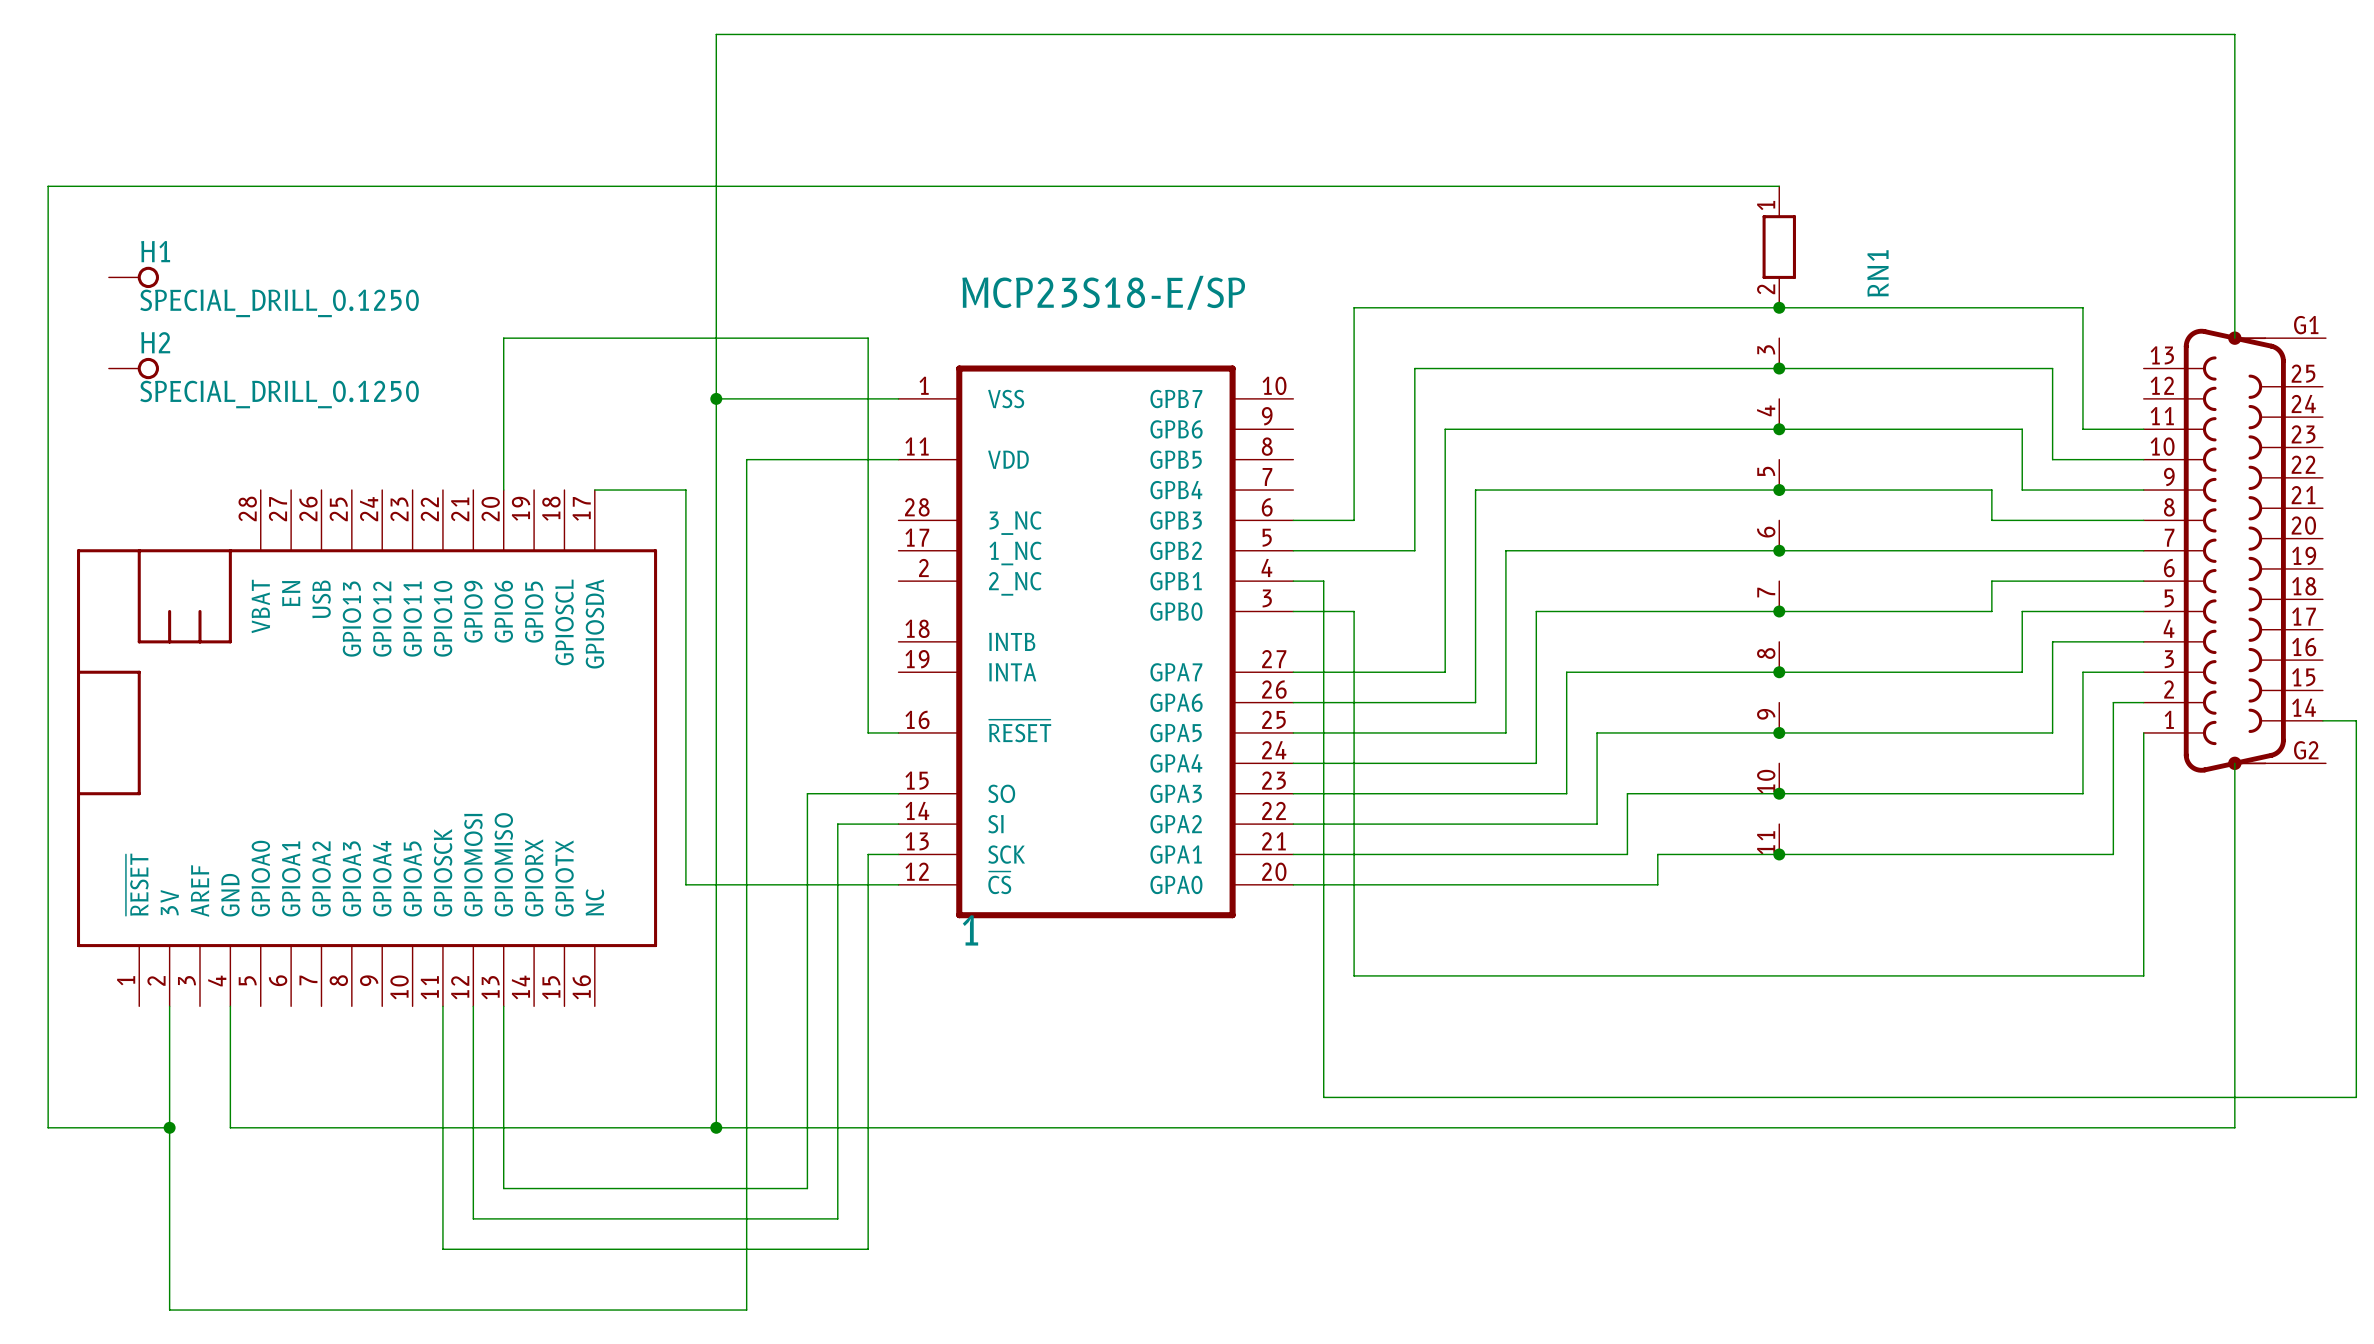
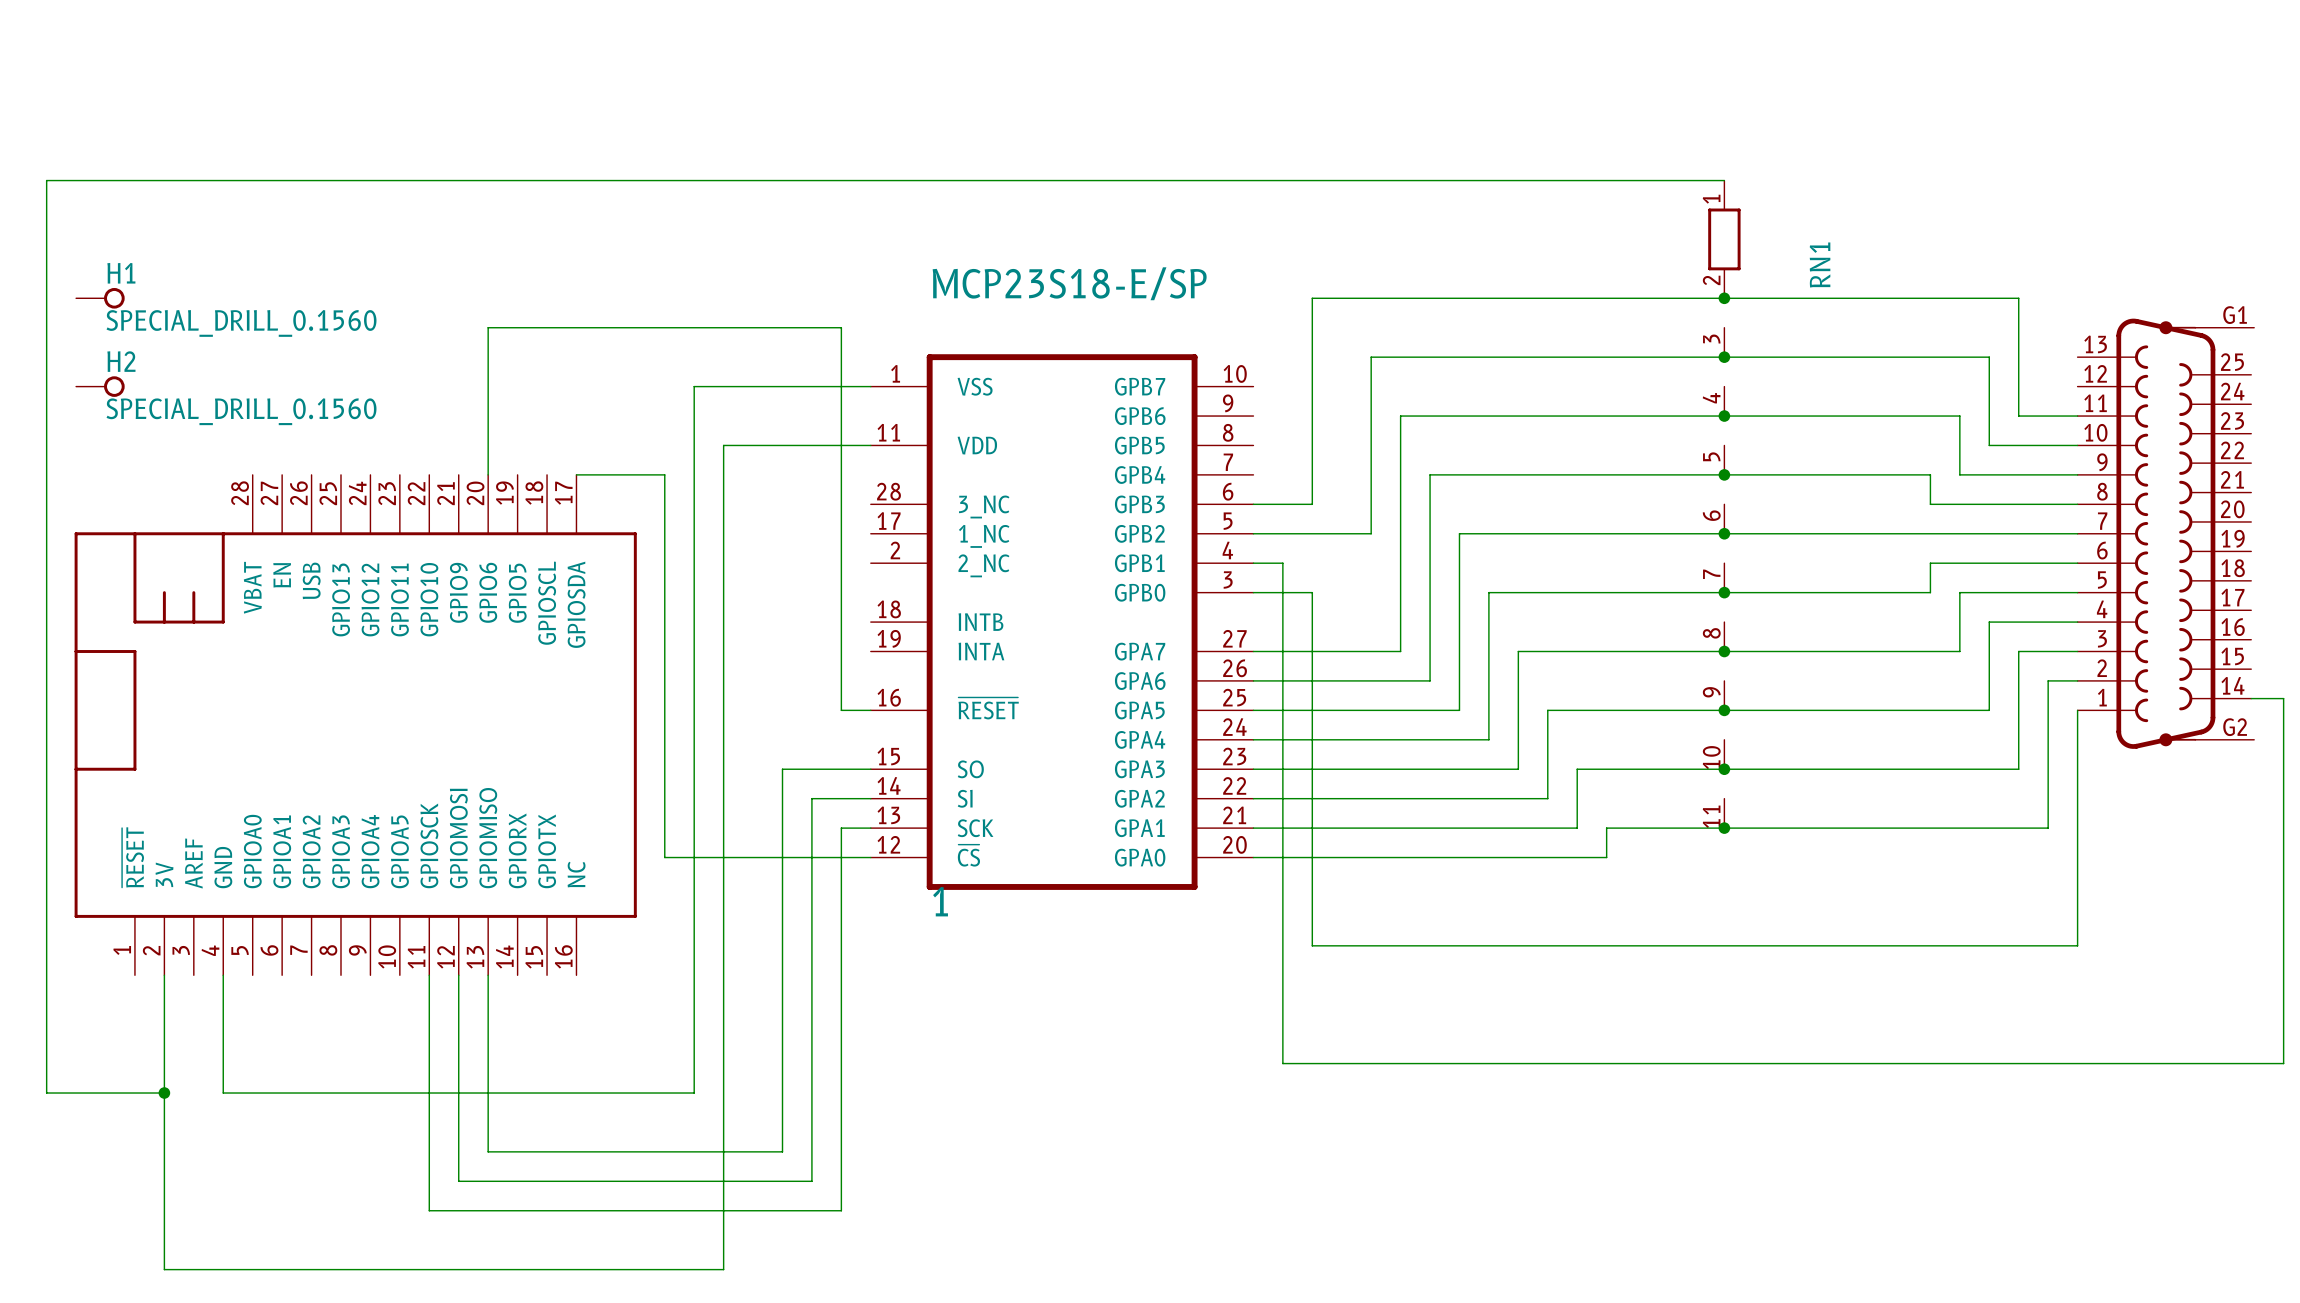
H1 position: (133, 277) -> (100, 298)
H1 value: SPECIAL_DRILL_0.1250 (279, 303) -> SPECIAL_DRILL_0.1560 (241, 323)
wire: (2234, 338) (2234, 34) (716, 34) (716, 398) -> none
H2 position: (133, 368) -> (100, 386)
H2 value: SPECIAL_DRILL_0.1250 (279, 394) -> SPECIAL_DRILL_0.1560 (241, 411)
junction: (716, 398) -> none
wire: (2234, 763) (2234, 1127) (716, 1127) -> none
junction: (716, 1127) -> none

